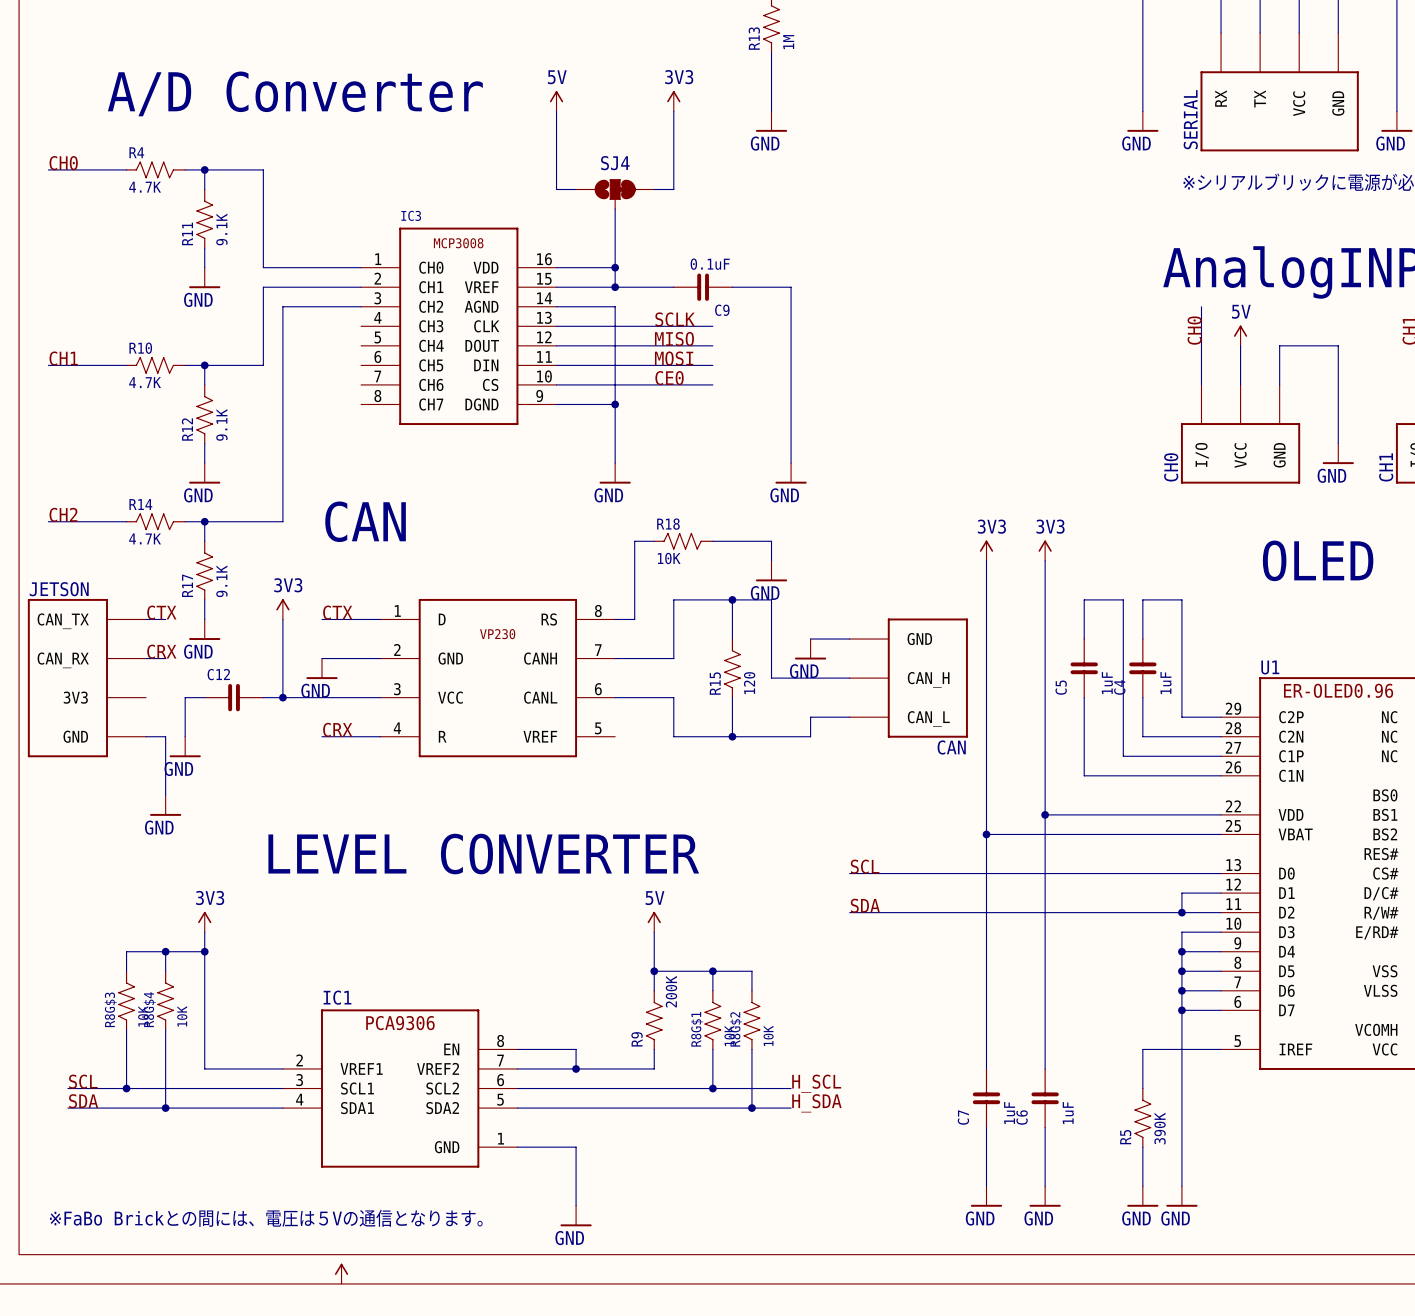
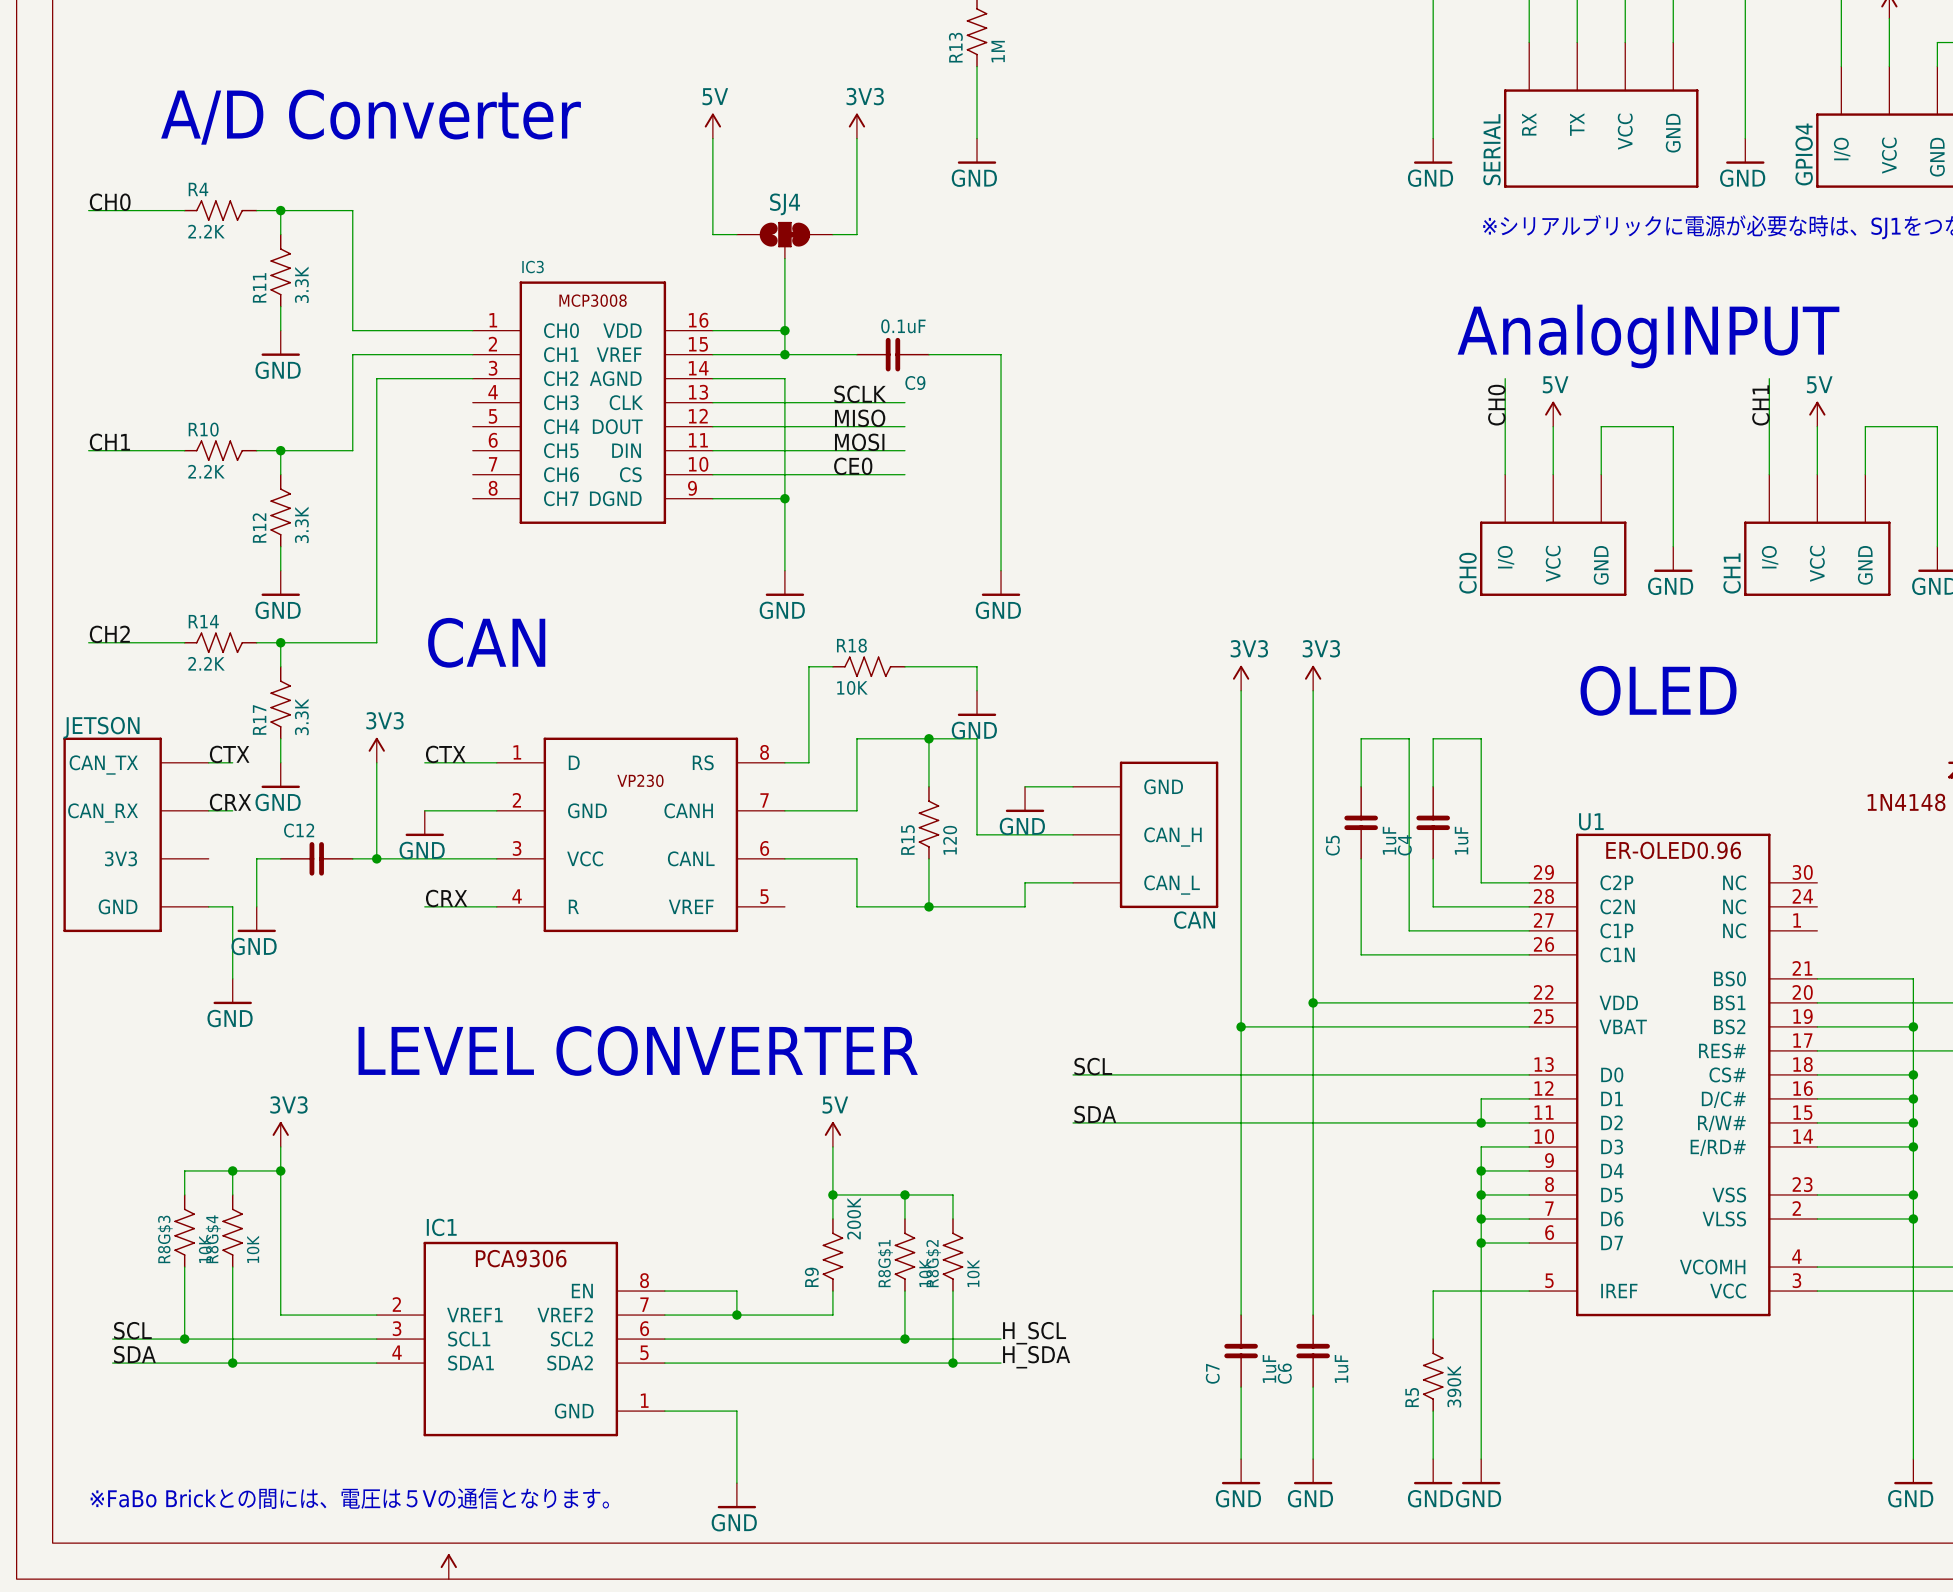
R4 value: 4.7K (145, 187) -> 2.2K (206, 231)
R11 value: 9.1K (221, 229) -> 3.3K (301, 284)
R10 value: 4.7K (145, 382) -> 2.2K (206, 471)
R12 value: 9.1K (221, 424) -> 3.3K (301, 524)
R14 value: 4.7K (145, 538) -> 2.2K (206, 663)
R17 value: 9.1K (221, 581) -> 3.3K (301, 716)

